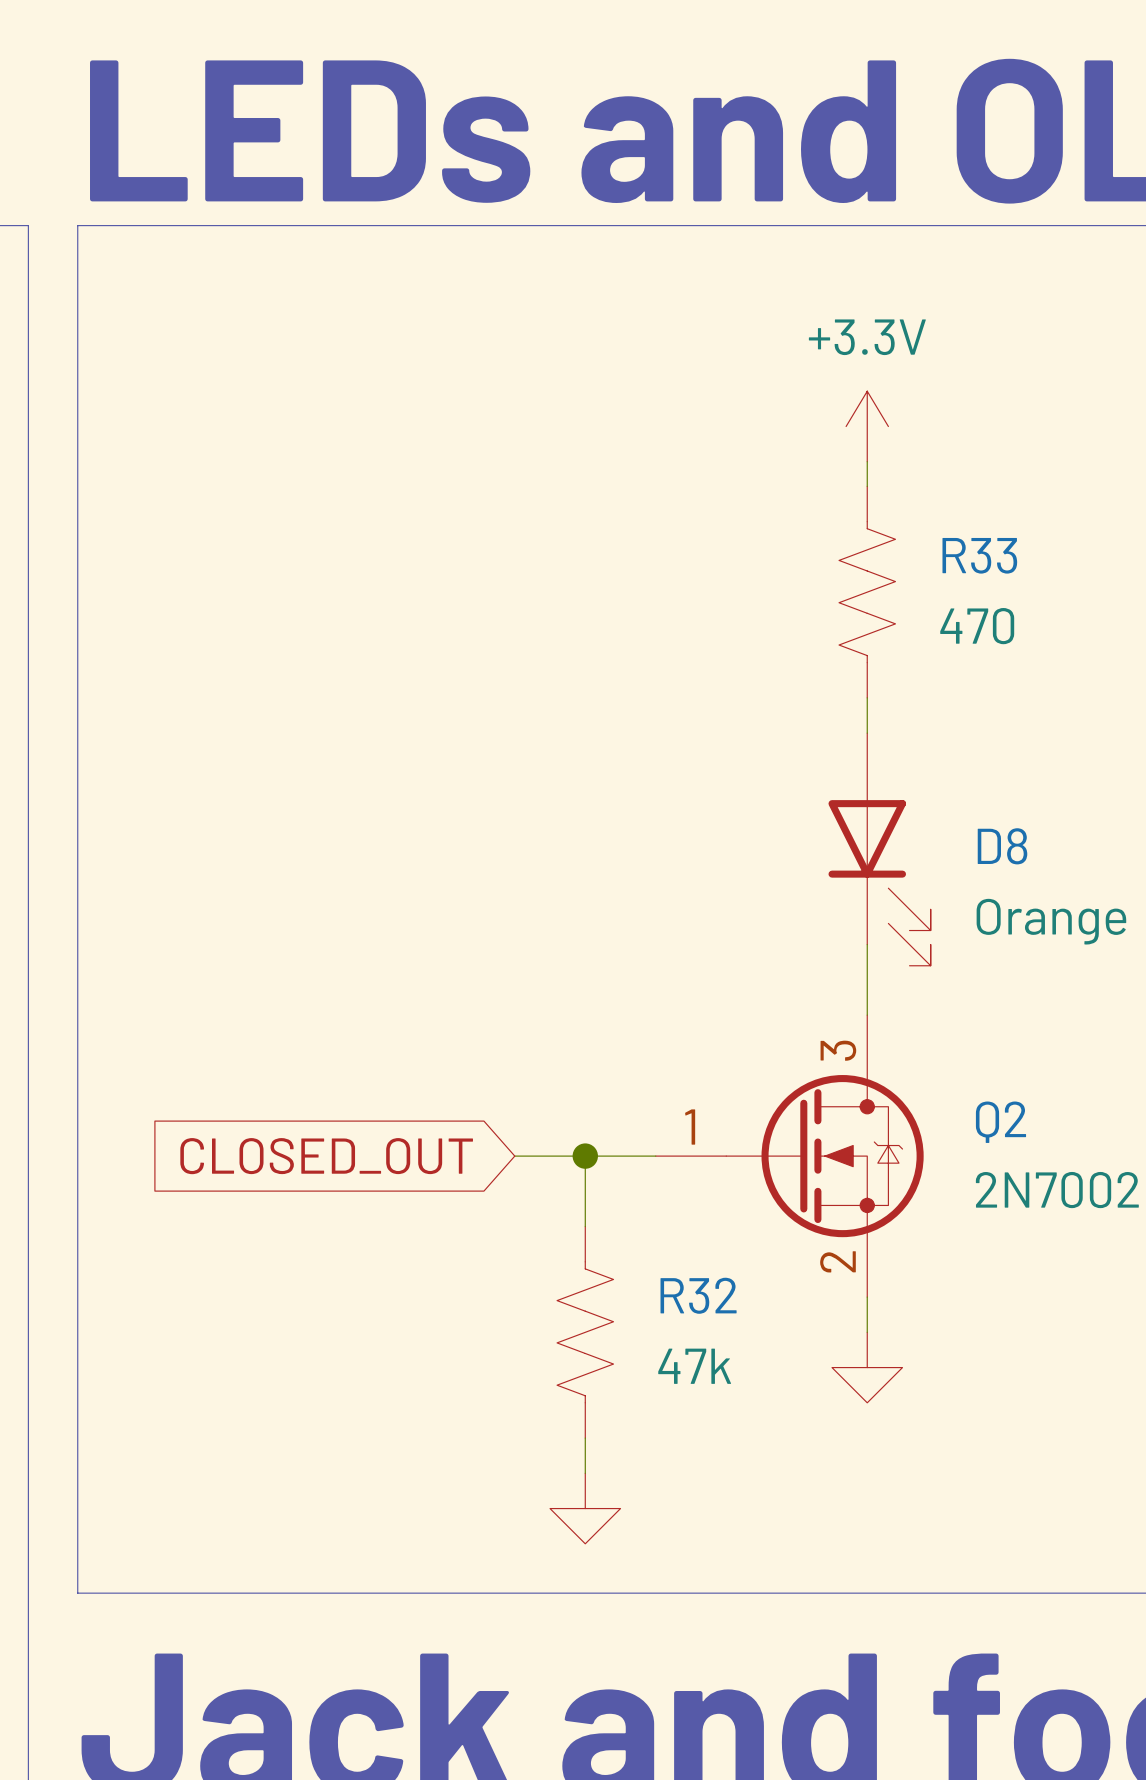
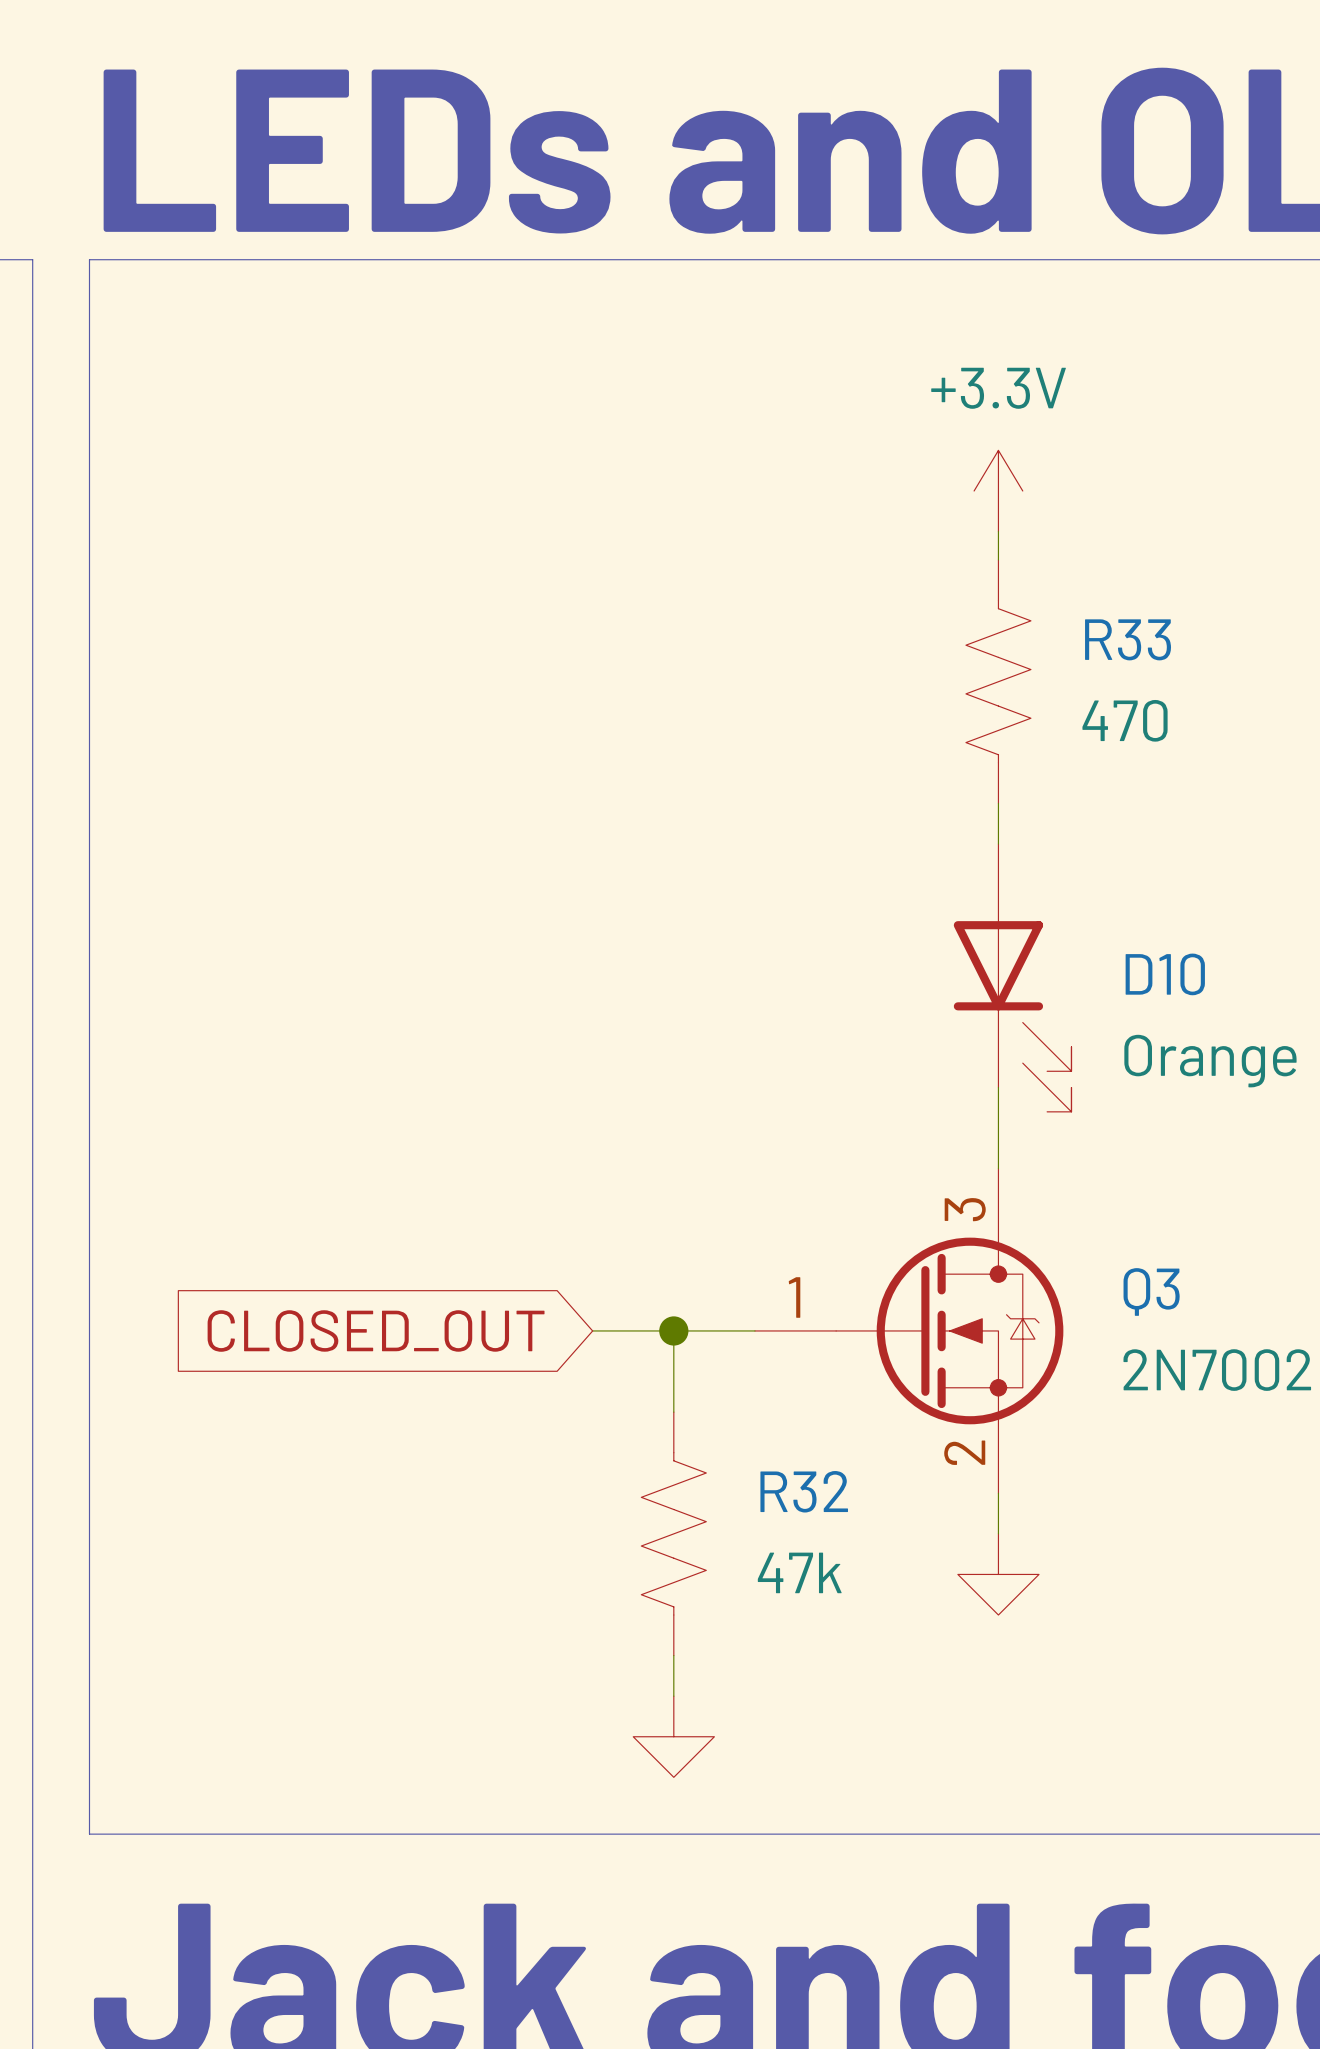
D8 name: D8 (1002, 846) -> D10 (1165, 974)
Q2 name: Q2 (1000, 1122) -> Q3 (1151, 1291)

